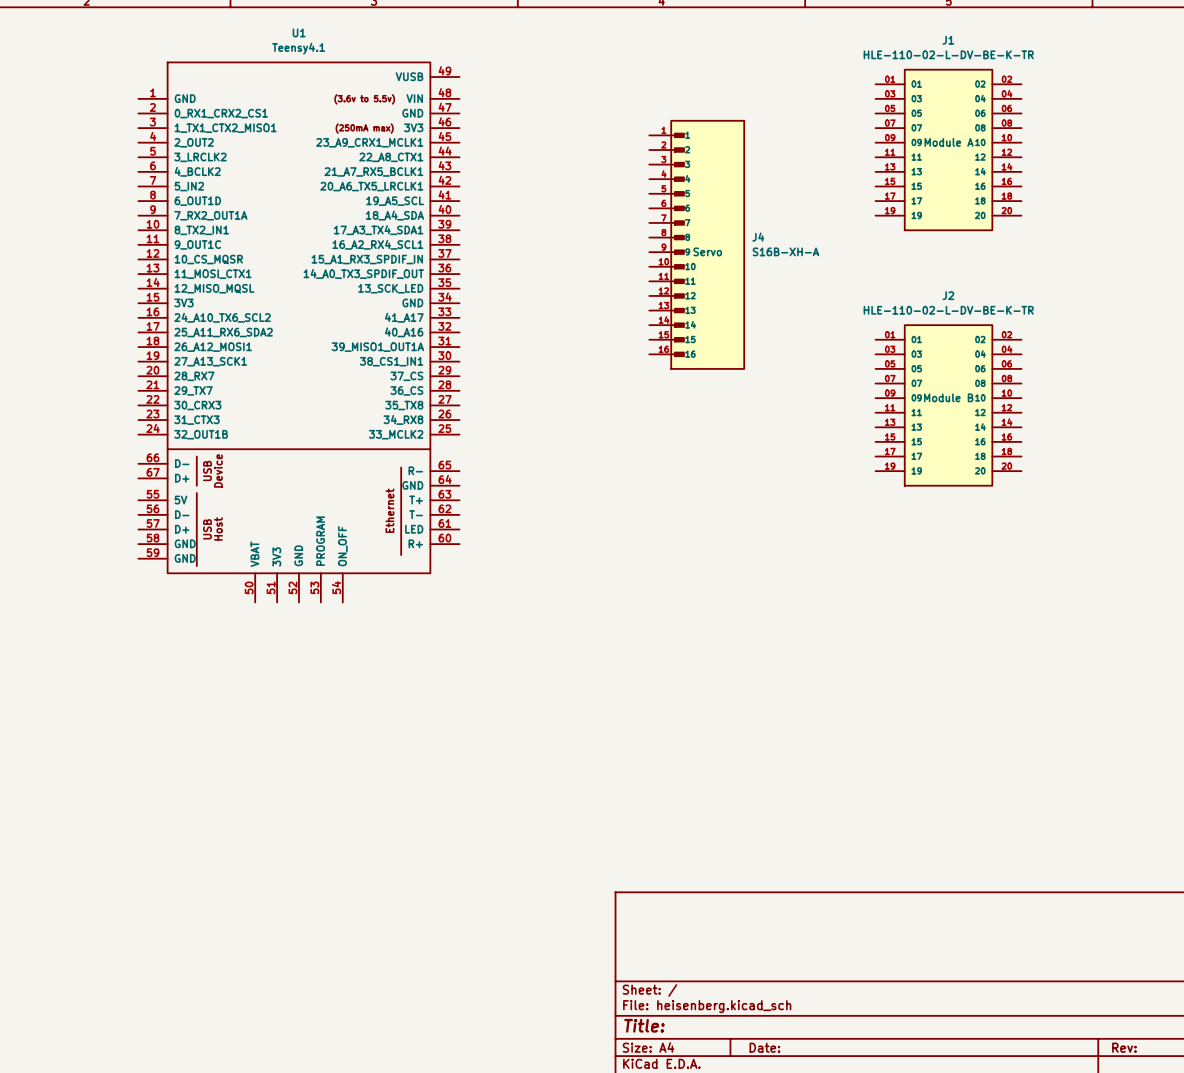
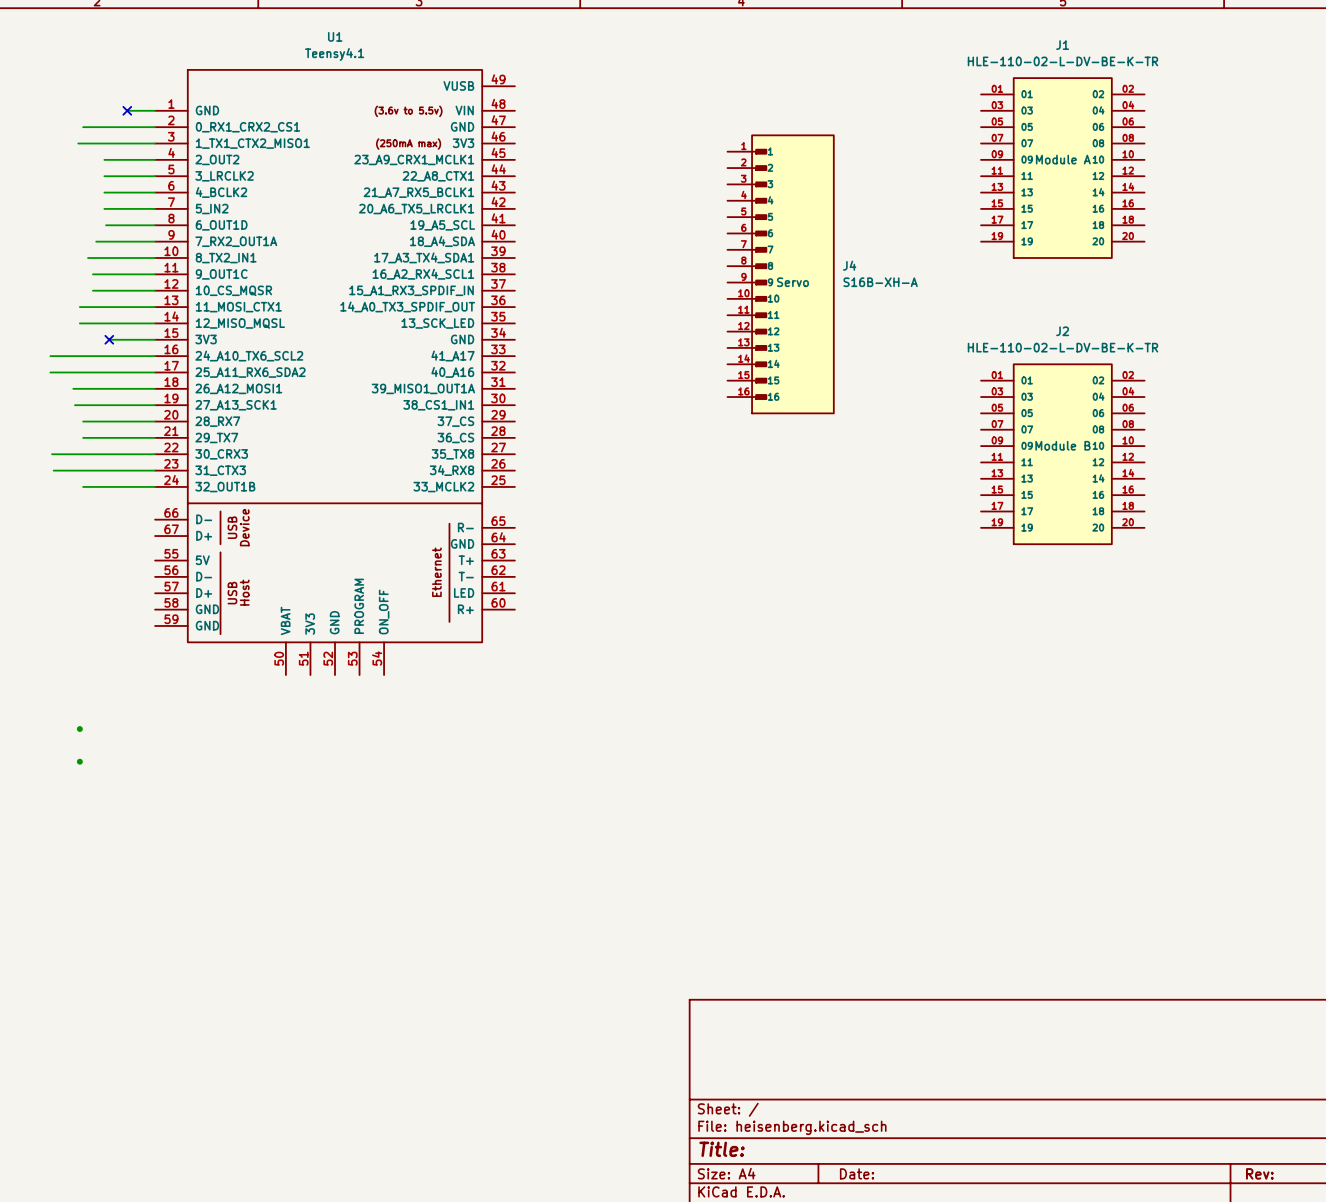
wire: none -> (127, 110) (155, 110)
no-connect mark: none -> (127, 110)
wire: none -> (83, 127) (155, 127)
wire: none -> (78, 143) (155, 143)
wire: none -> (104, 159) (155, 159)
wire: none -> (104, 176) (155, 176)
wire: none -> (104, 192) (155, 192)
wire: none -> (104, 208) (155, 208)
wire: none -> (106, 225) (155, 225)
wire: none -> (96, 241) (155, 241)
wire: none -> (88, 258) (155, 258)
wire: none -> (92, 274) (155, 274)
wire: none -> (92, 290) (155, 290)
wire: none -> (79, 307) (155, 307)
wire: none -> (79, 323) (155, 323)
wire: none -> (109, 339) (155, 339)
no-connect mark: none -> (109, 339)
wire: none -> (50, 356) (155, 356)
wire: none -> (50, 372) (155, 372)
wire: none -> (73, 388) (155, 388)
wire: none -> (74, 405) (155, 405)
wire: none -> (83, 421) (155, 421)
wire: none -> (83, 437) (155, 437)
wire: none -> (52, 454) (155, 454)
wire: none -> (53, 470) (155, 470)
wire: none -> (83, 486) (155, 486)
junction: none -> (79, 729)
junction: none -> (79, 761)

